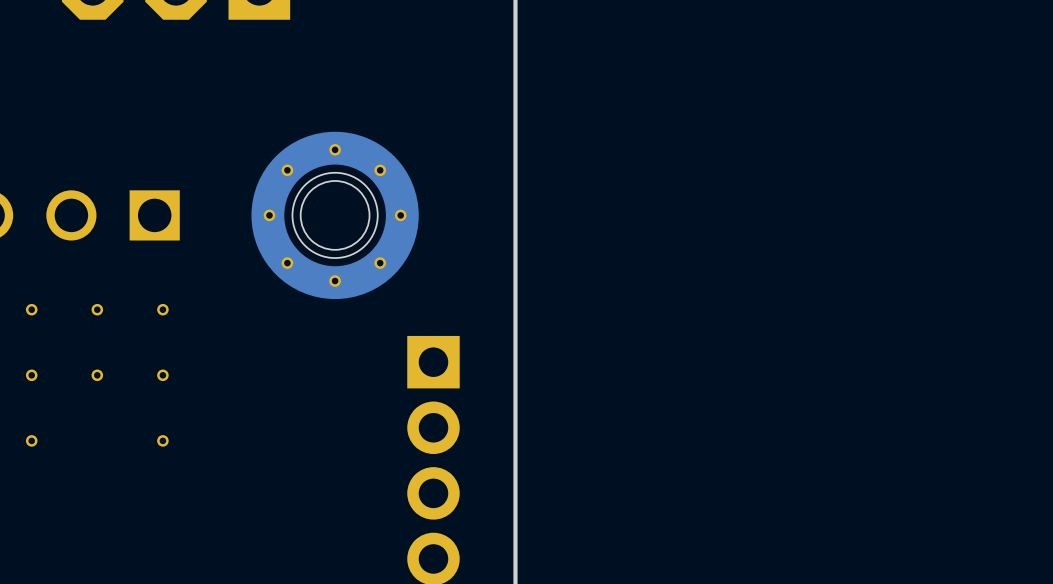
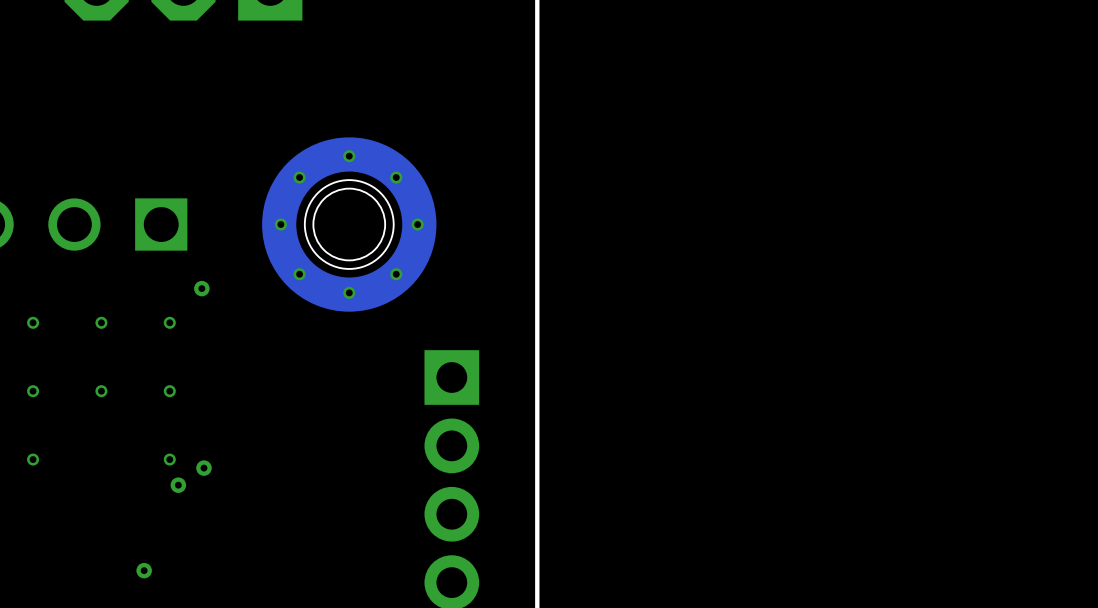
via: none -> (201, 288)
via: none -> (203, 468)
via: none -> (178, 485)
via: none -> (144, 570)

